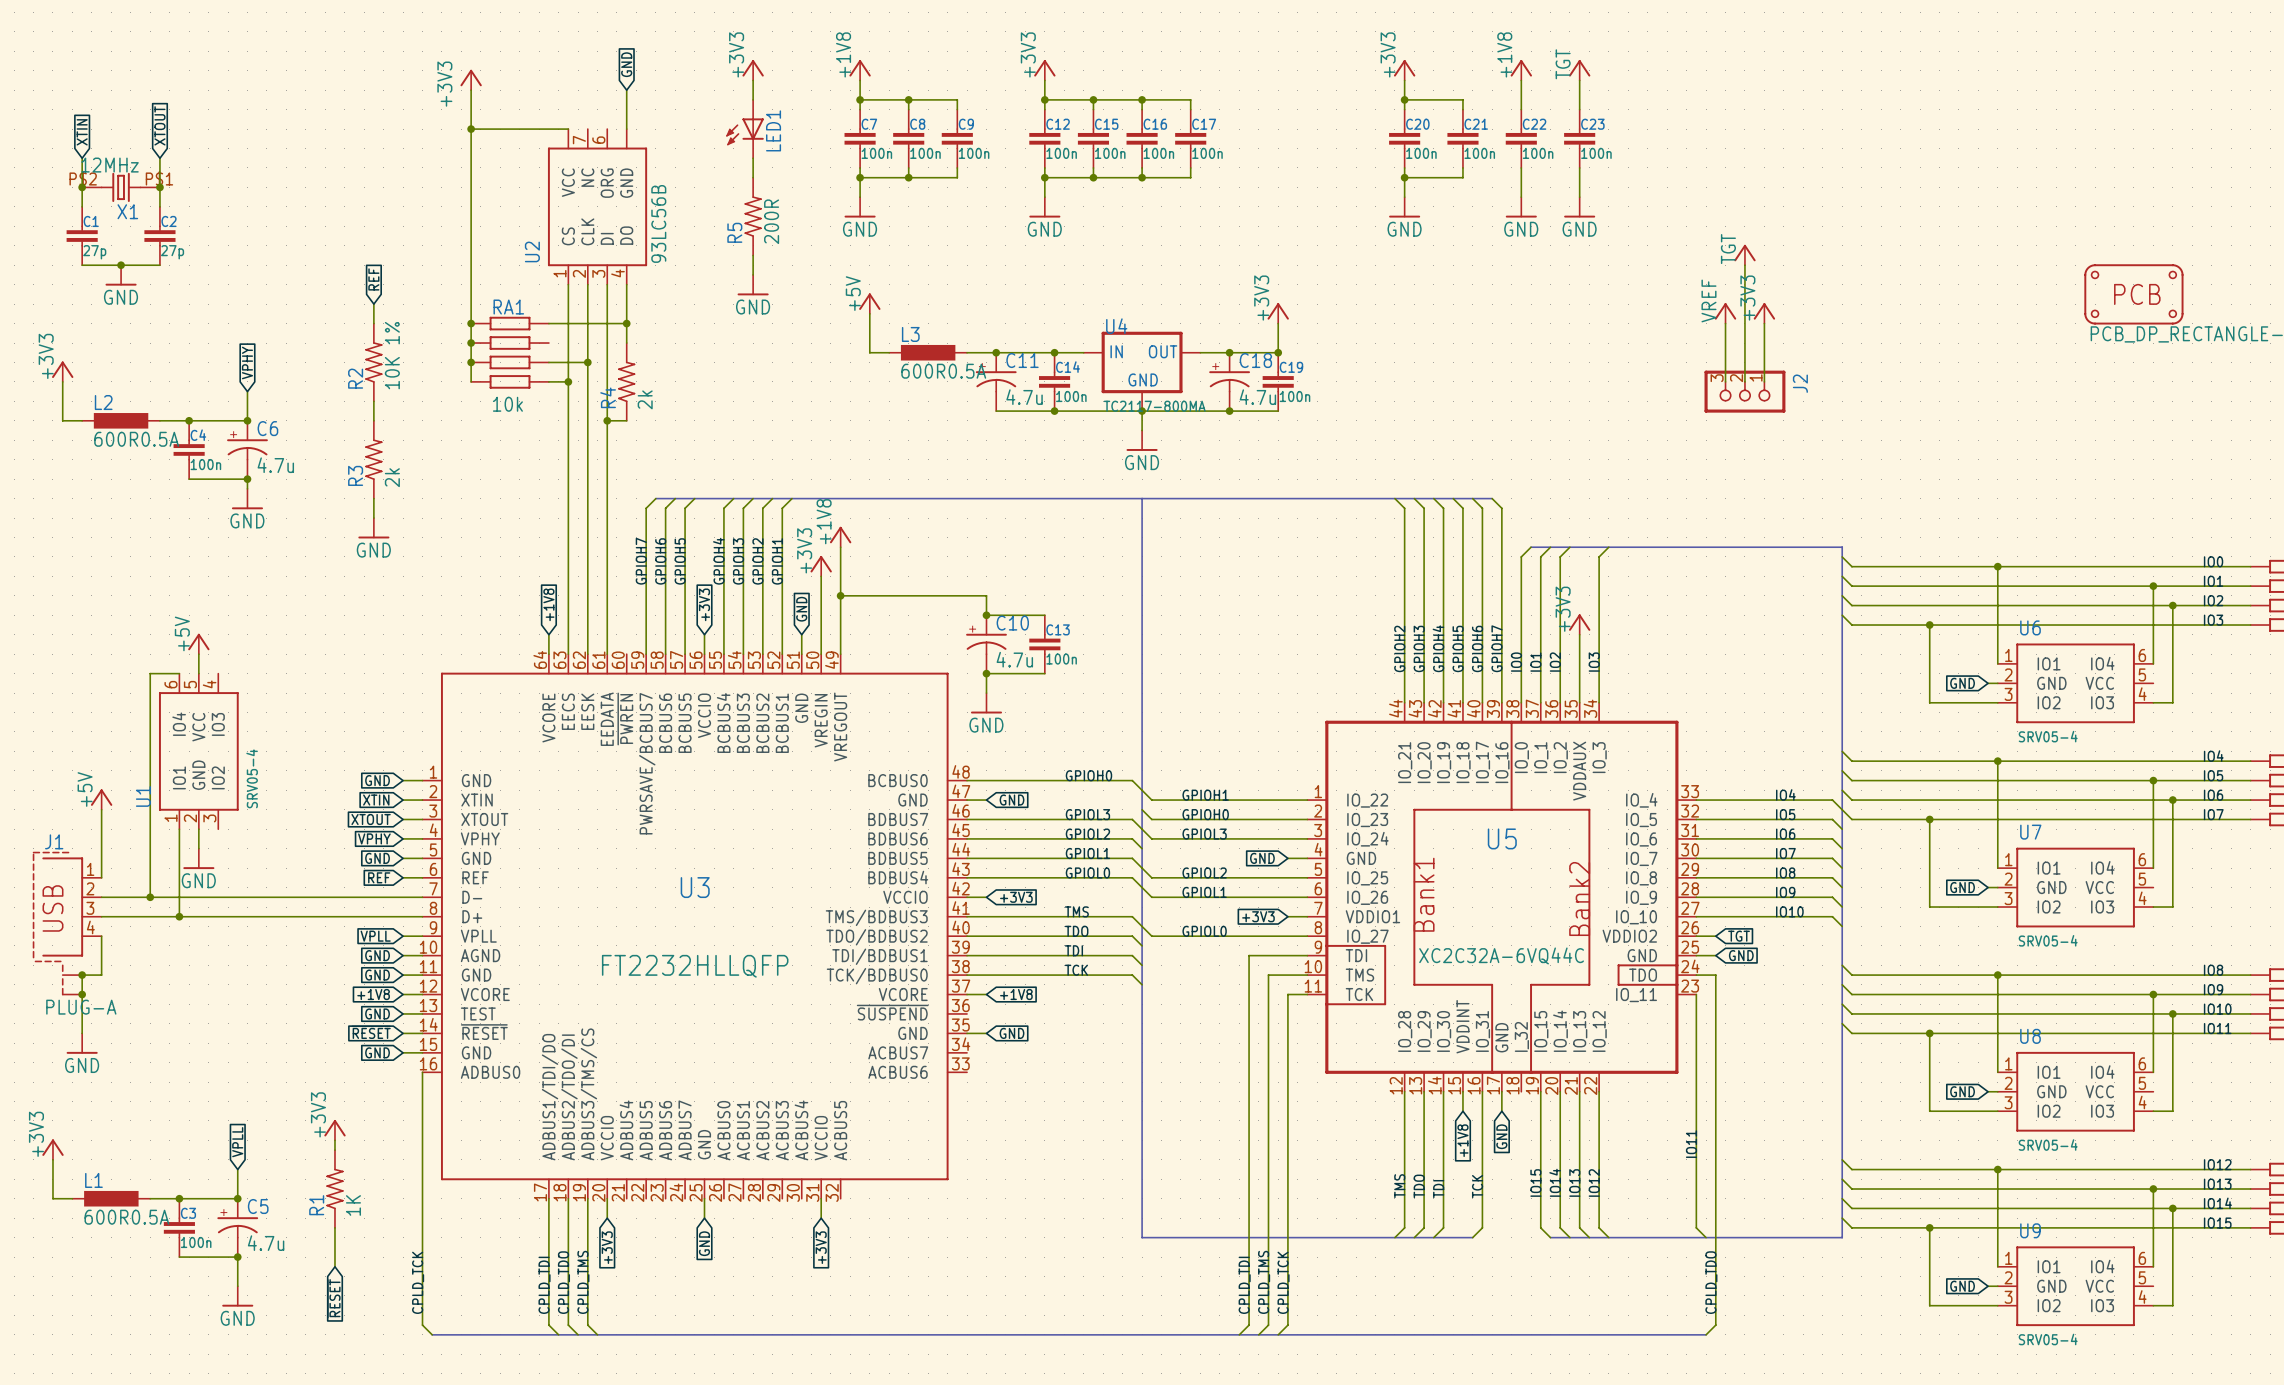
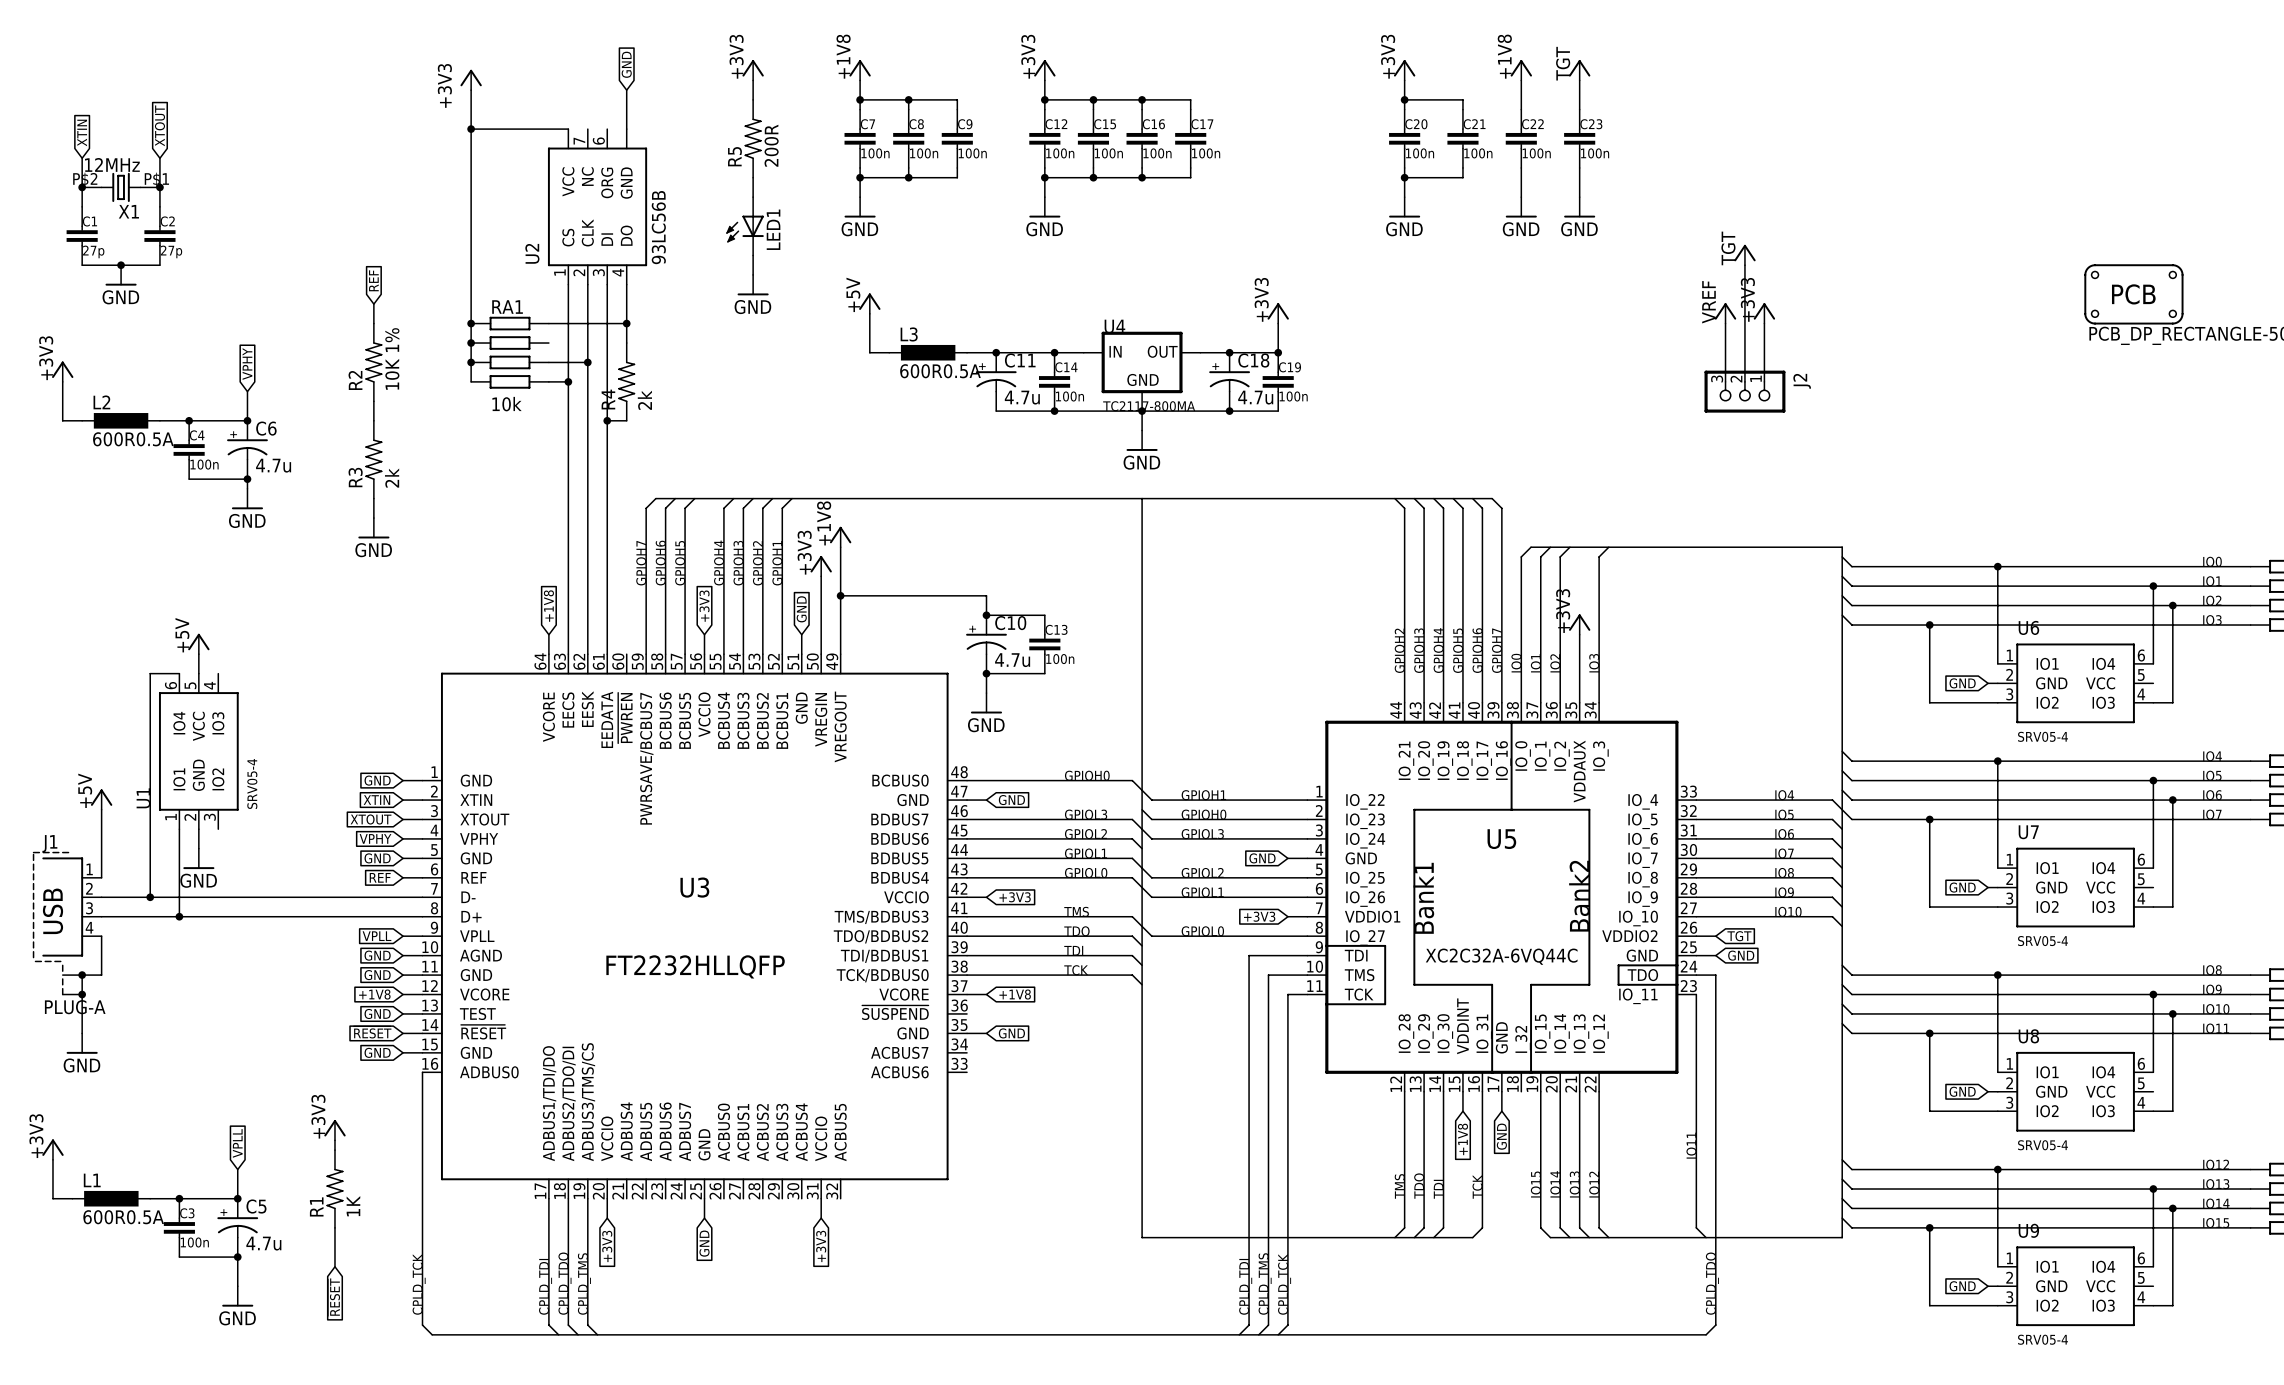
LED1 position: (745, 129) -> (745, 226)
R5 position: (753, 216) -> (753, 138)

